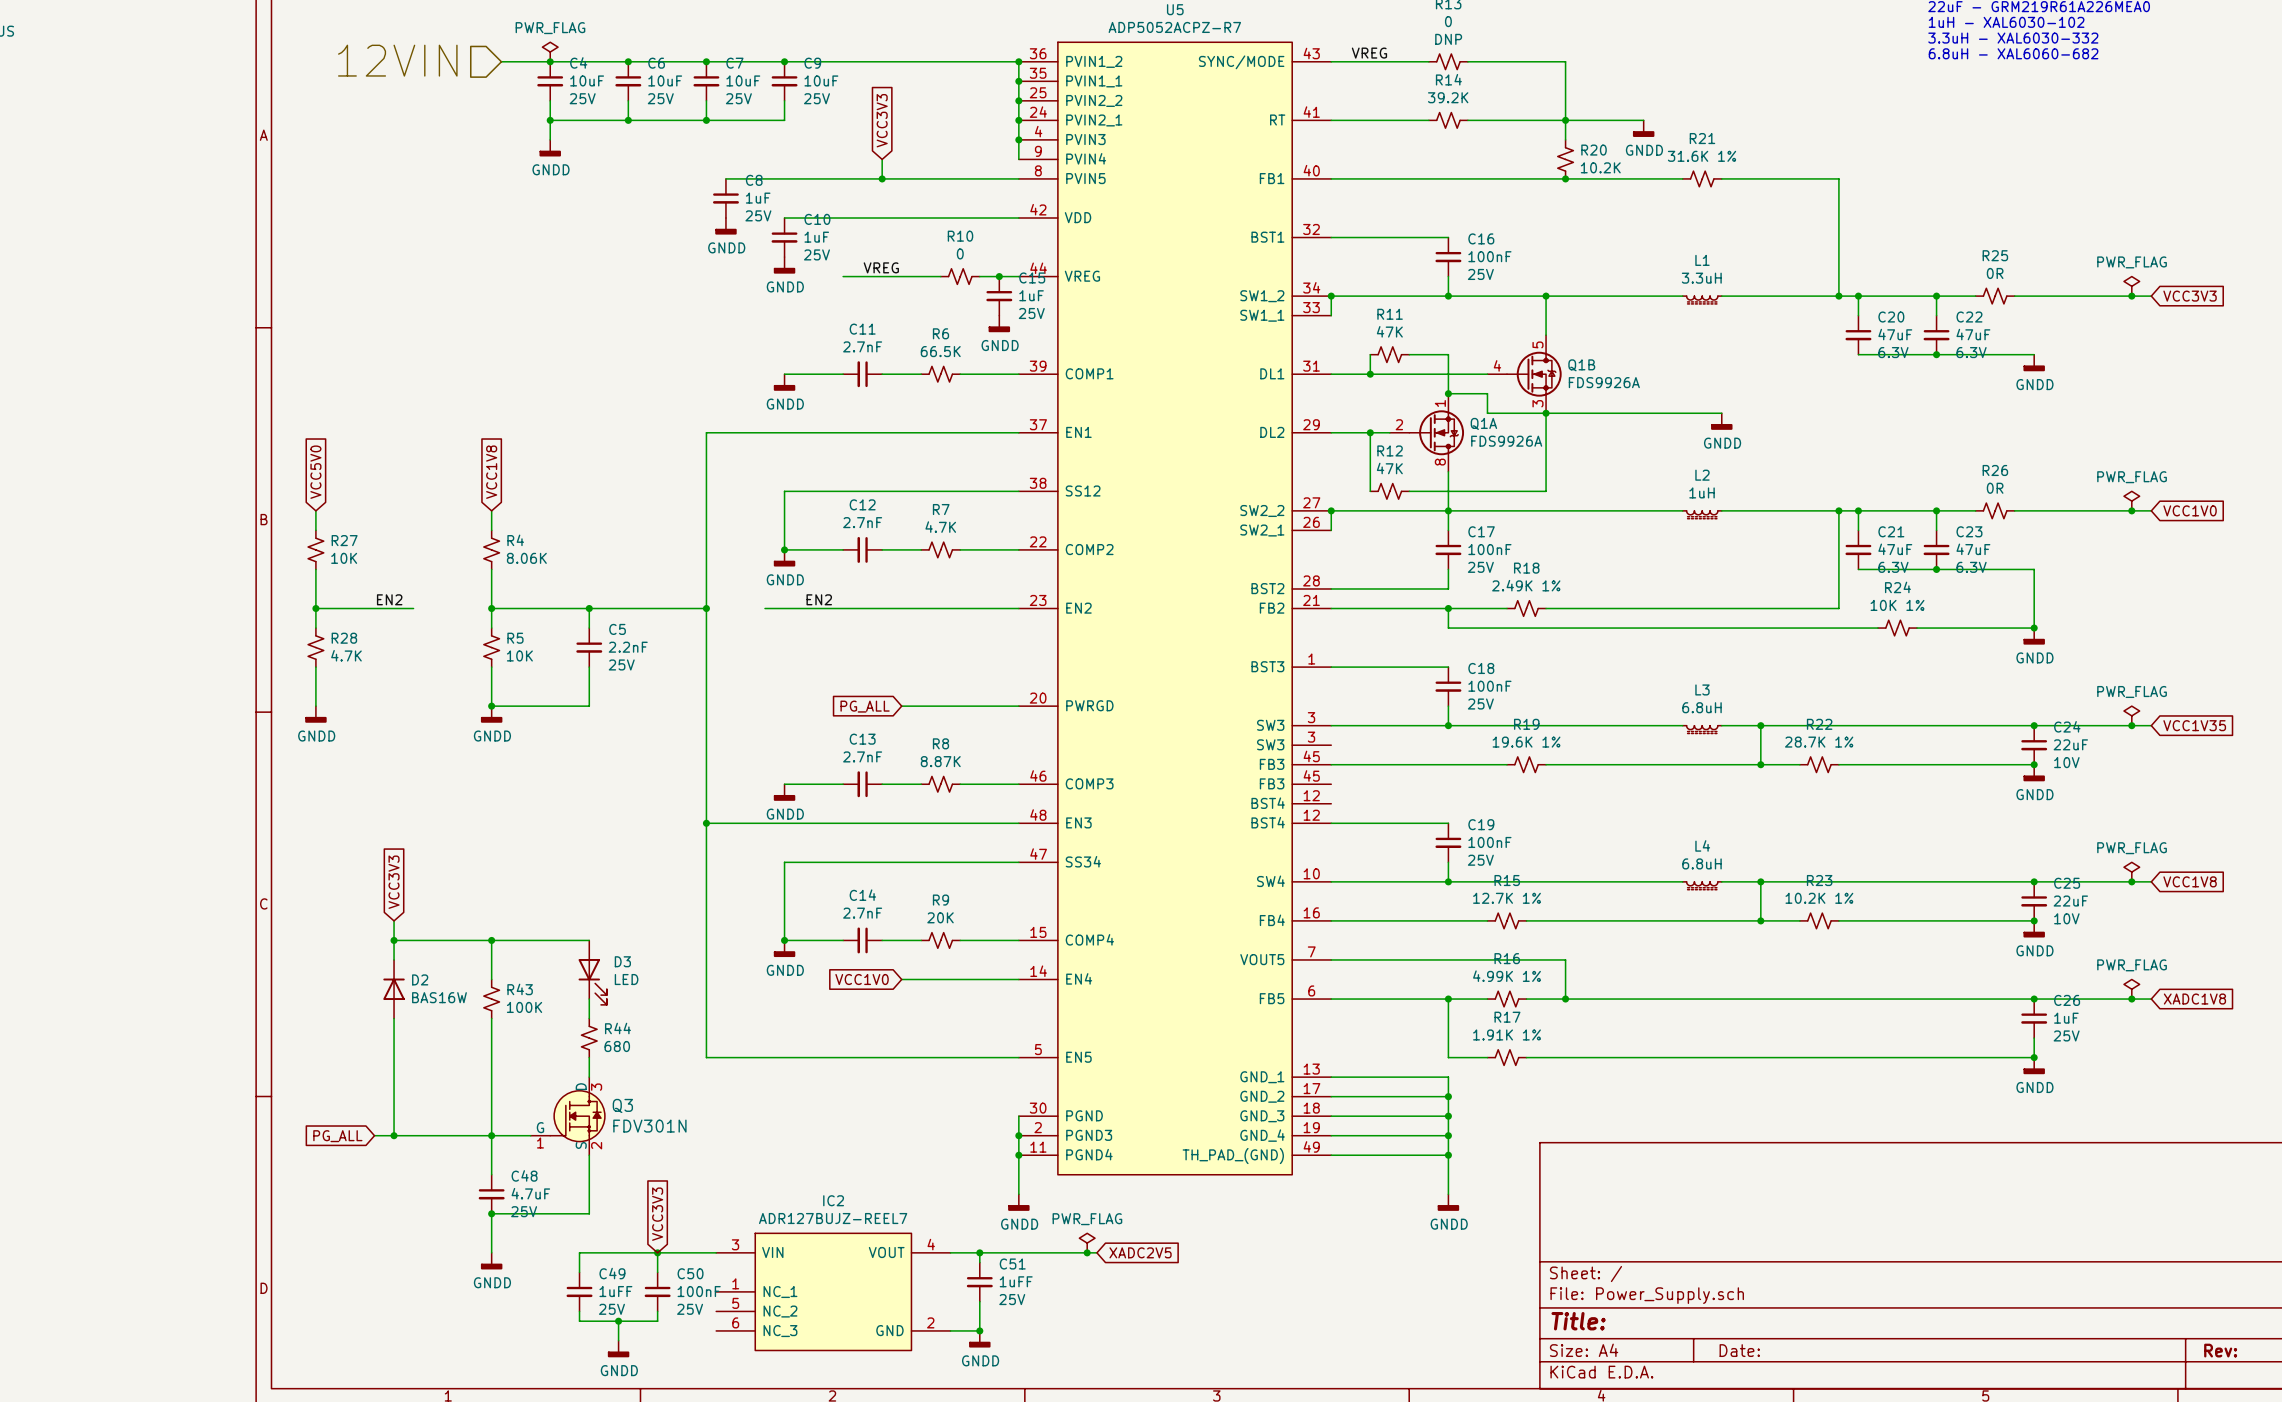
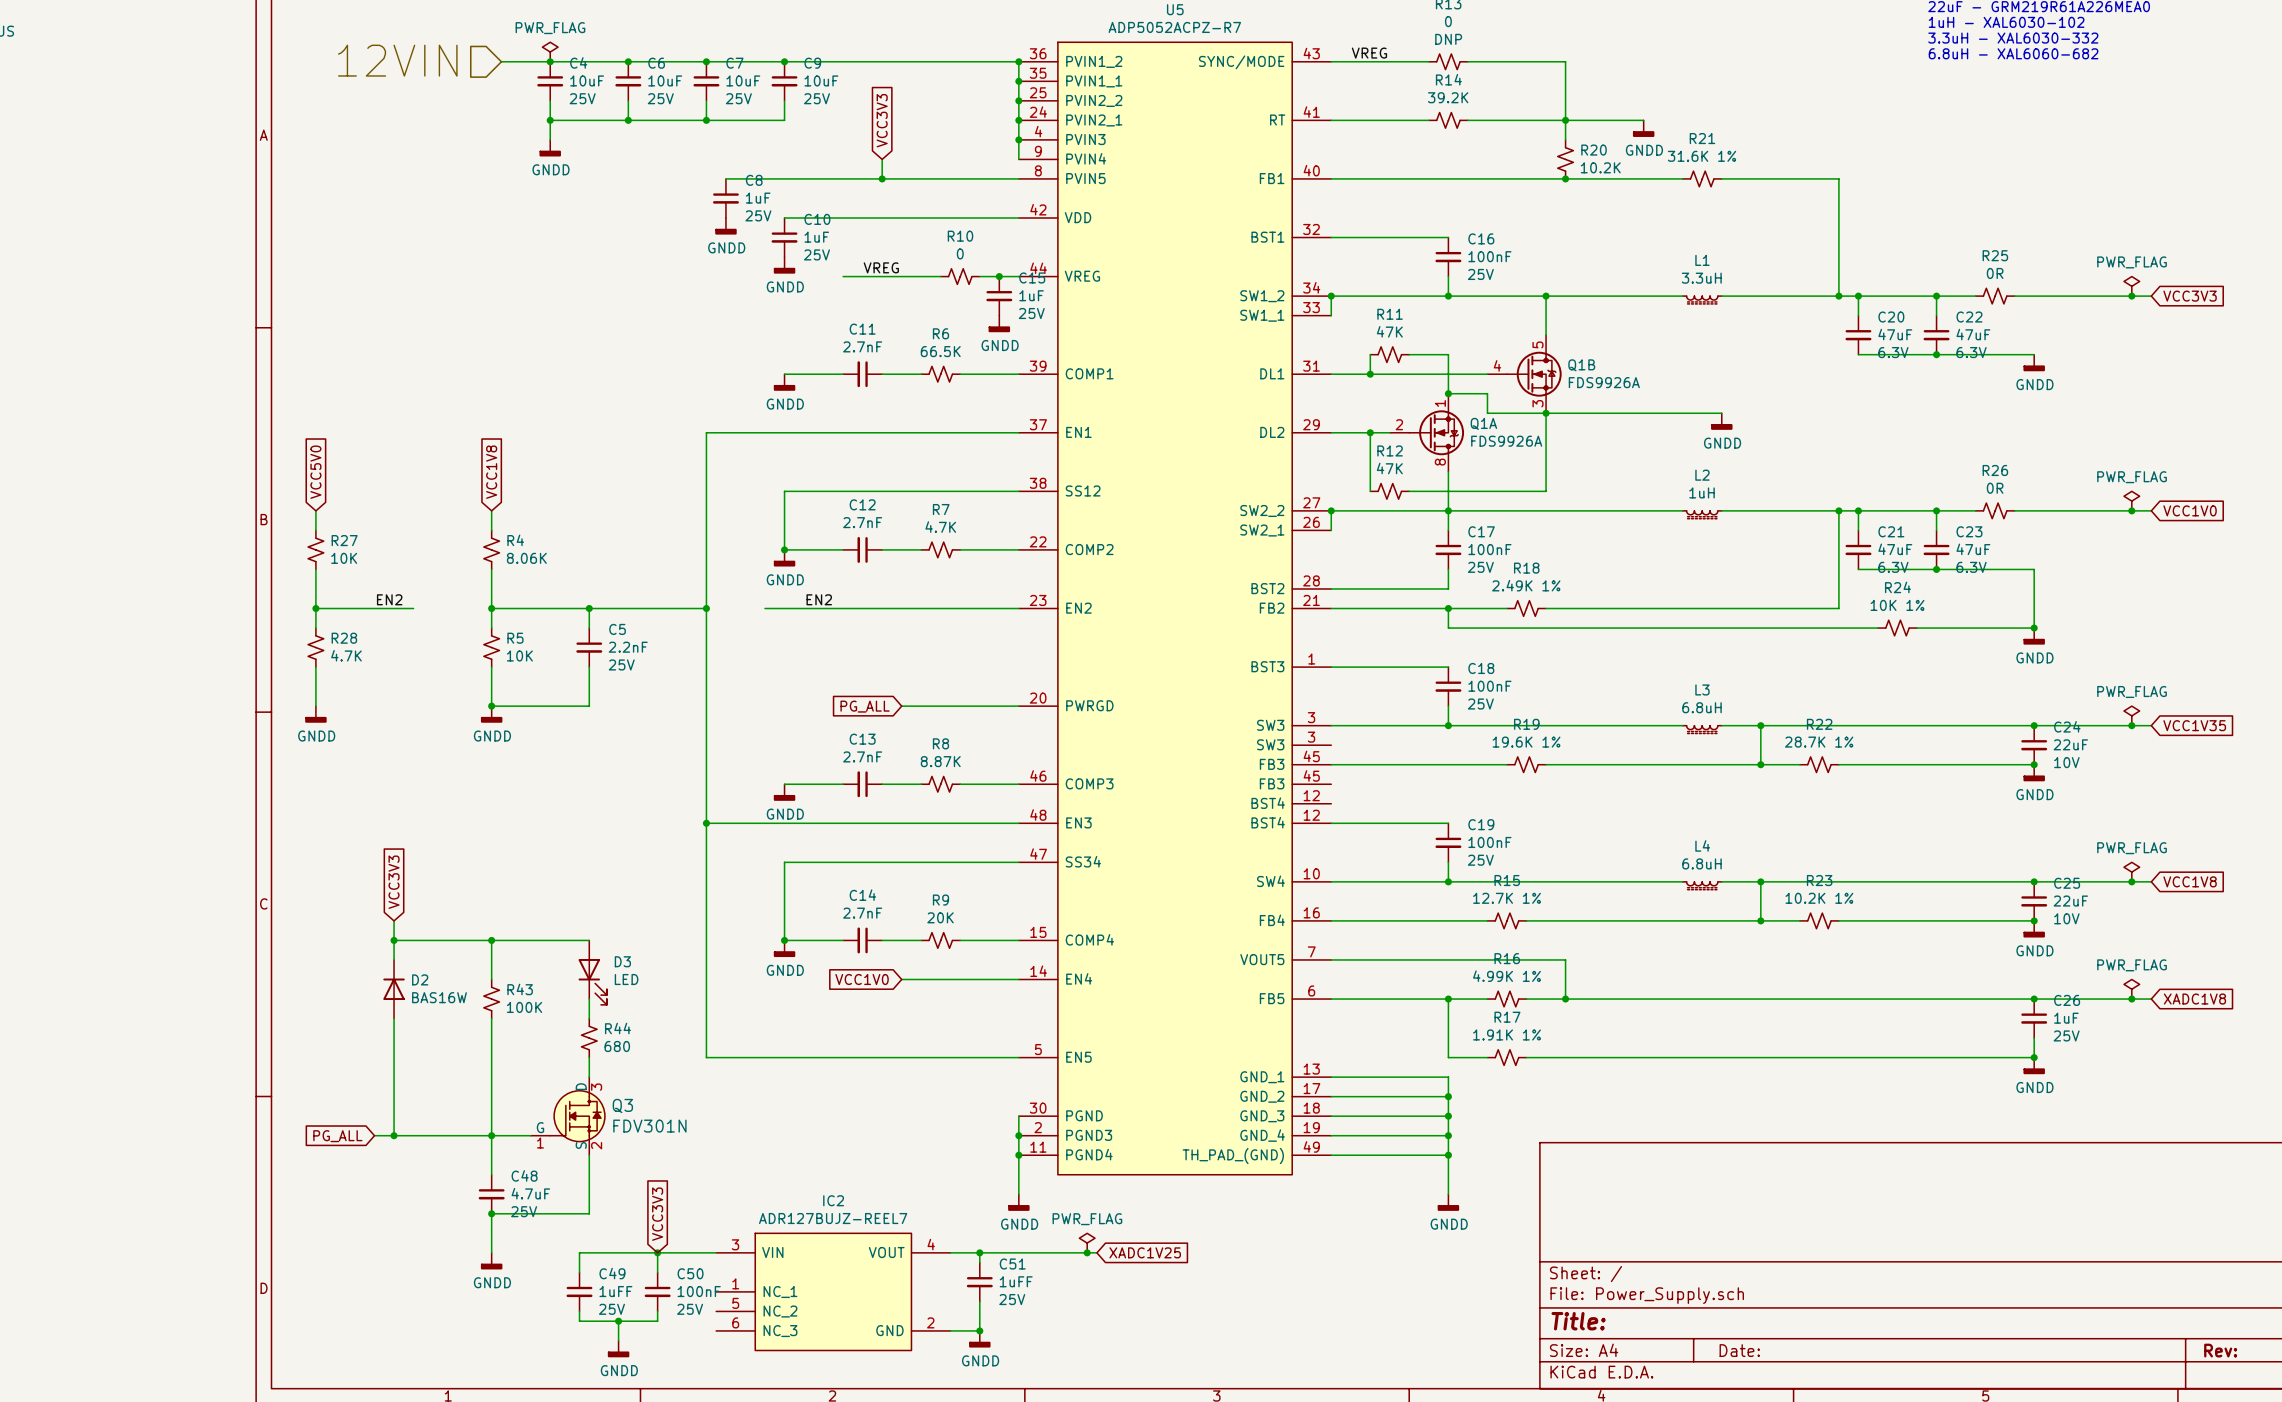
global label: XADC2V5 (1140, 1252) -> XADC1V25 (1145, 1252)

